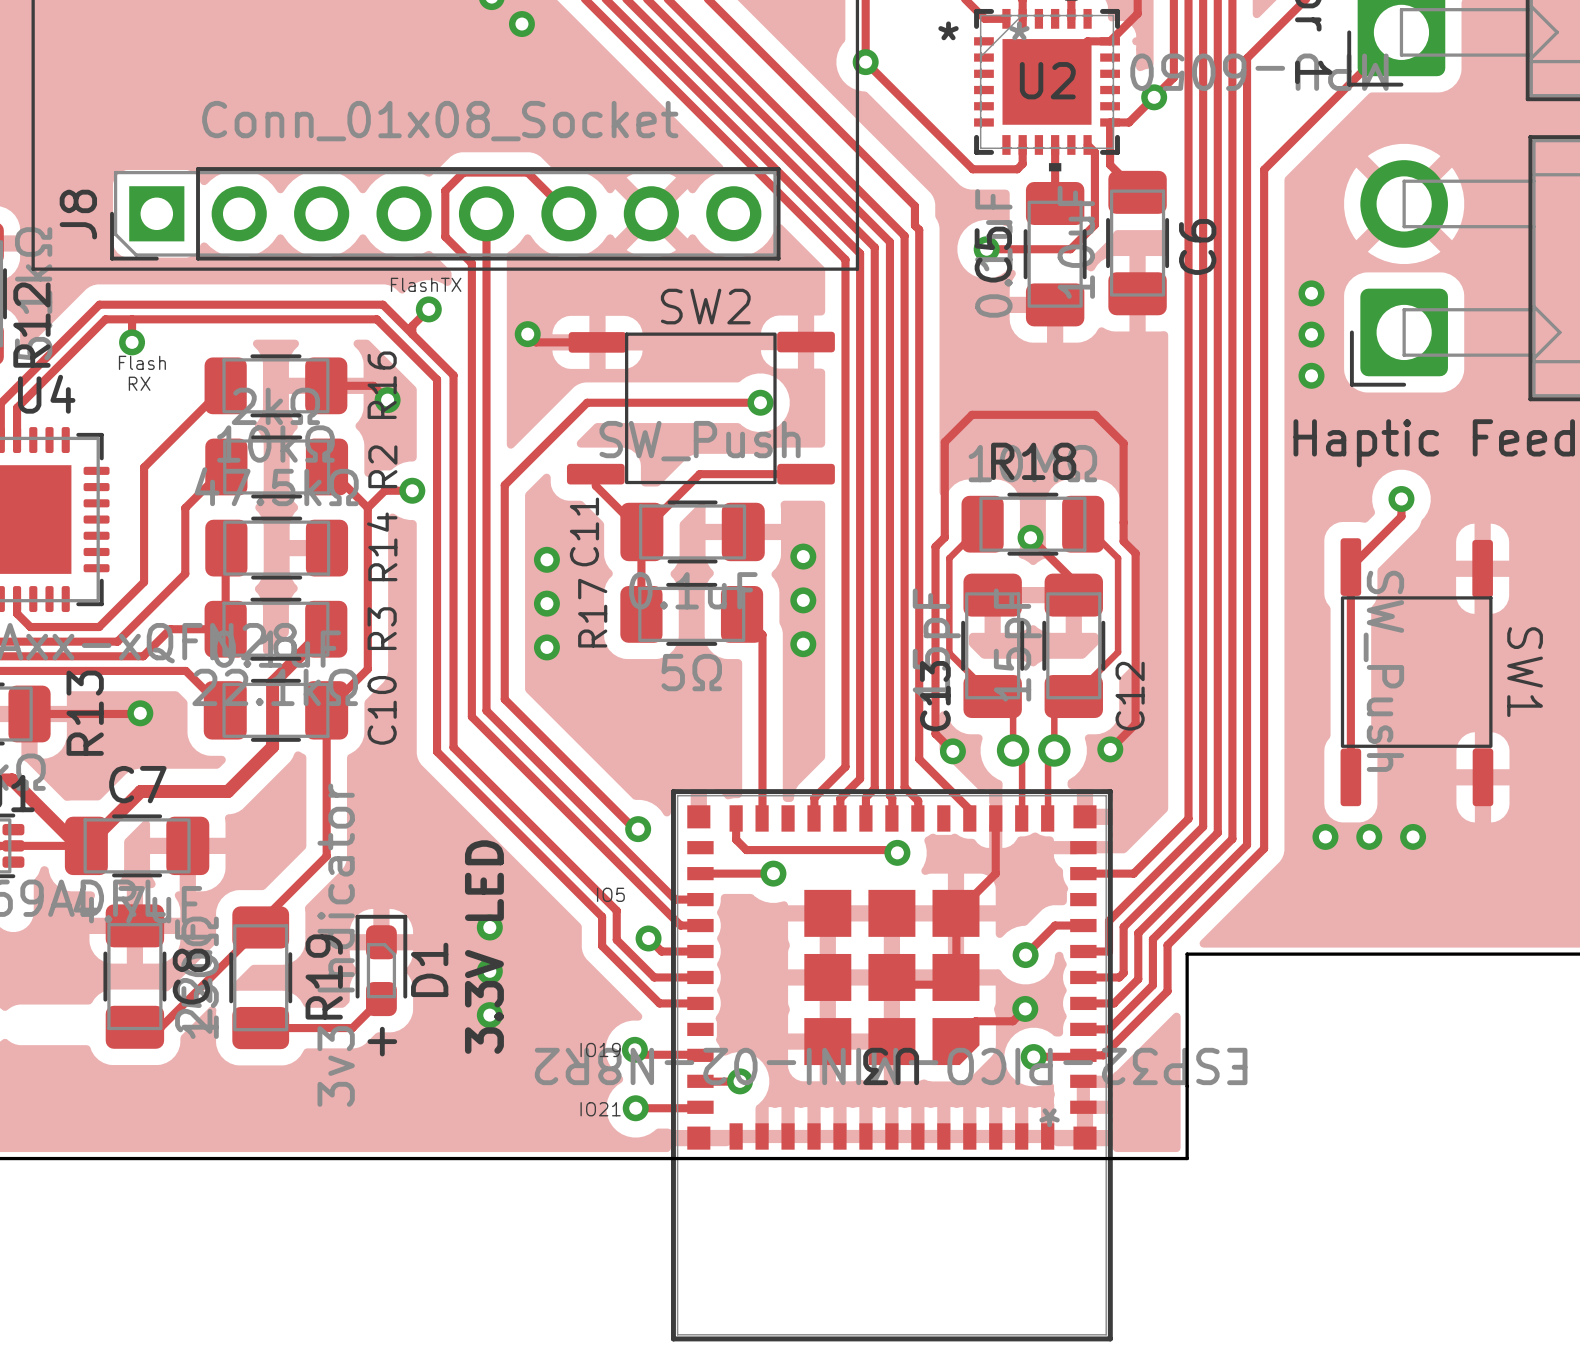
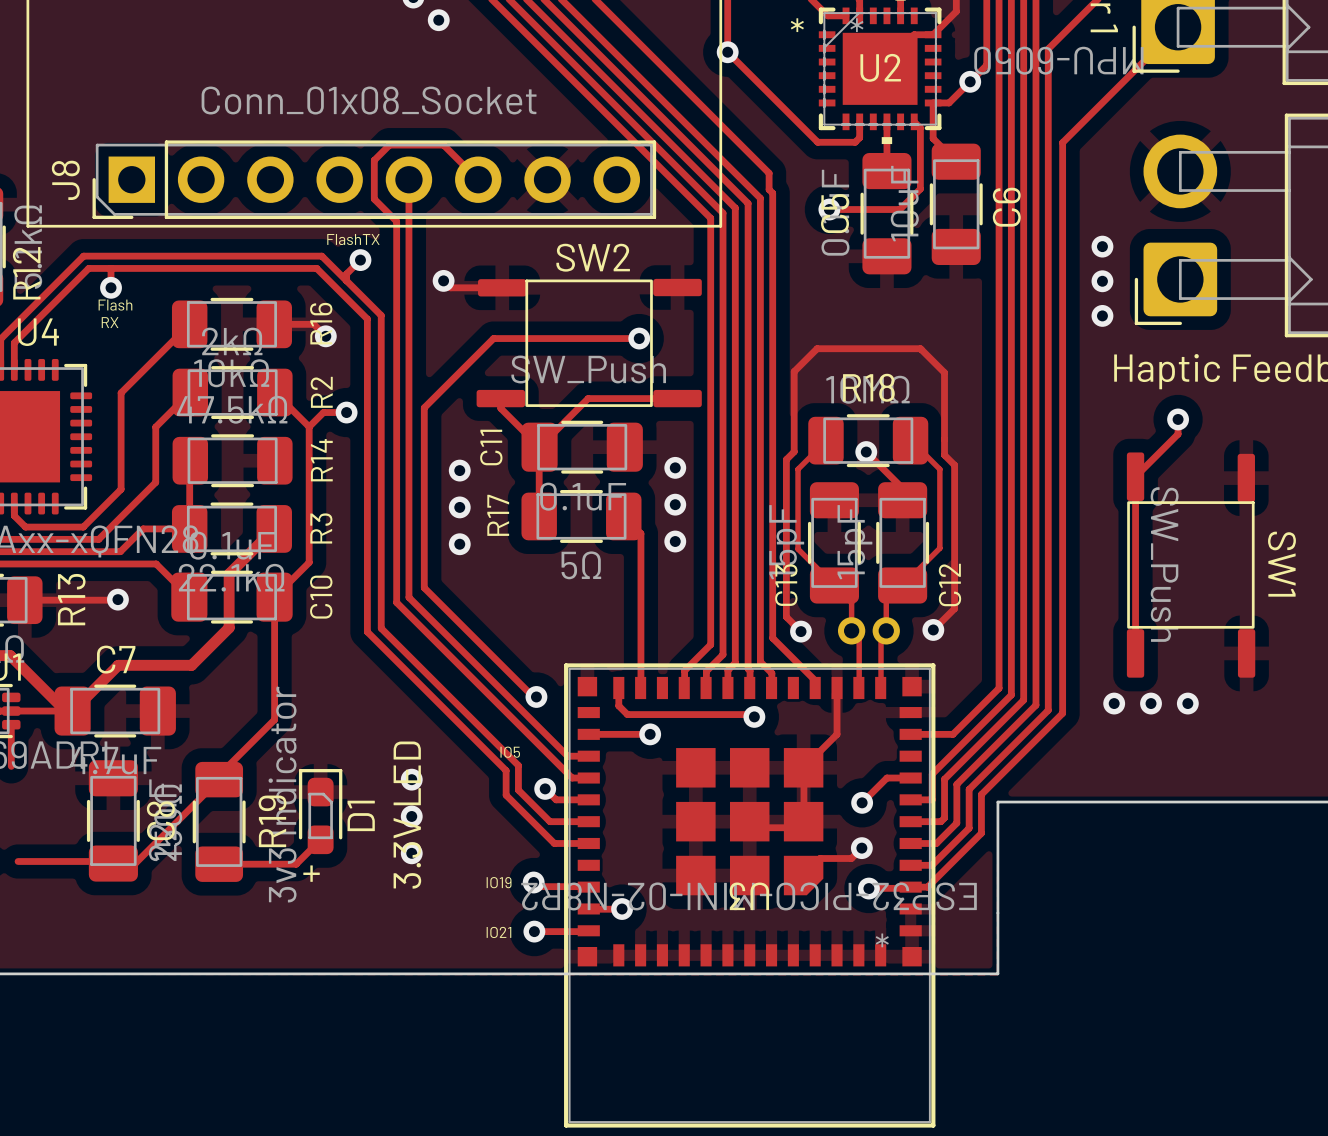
track: none -> (11, 724) (11, 766)
track: none -> (18, 861) (113, 861)

